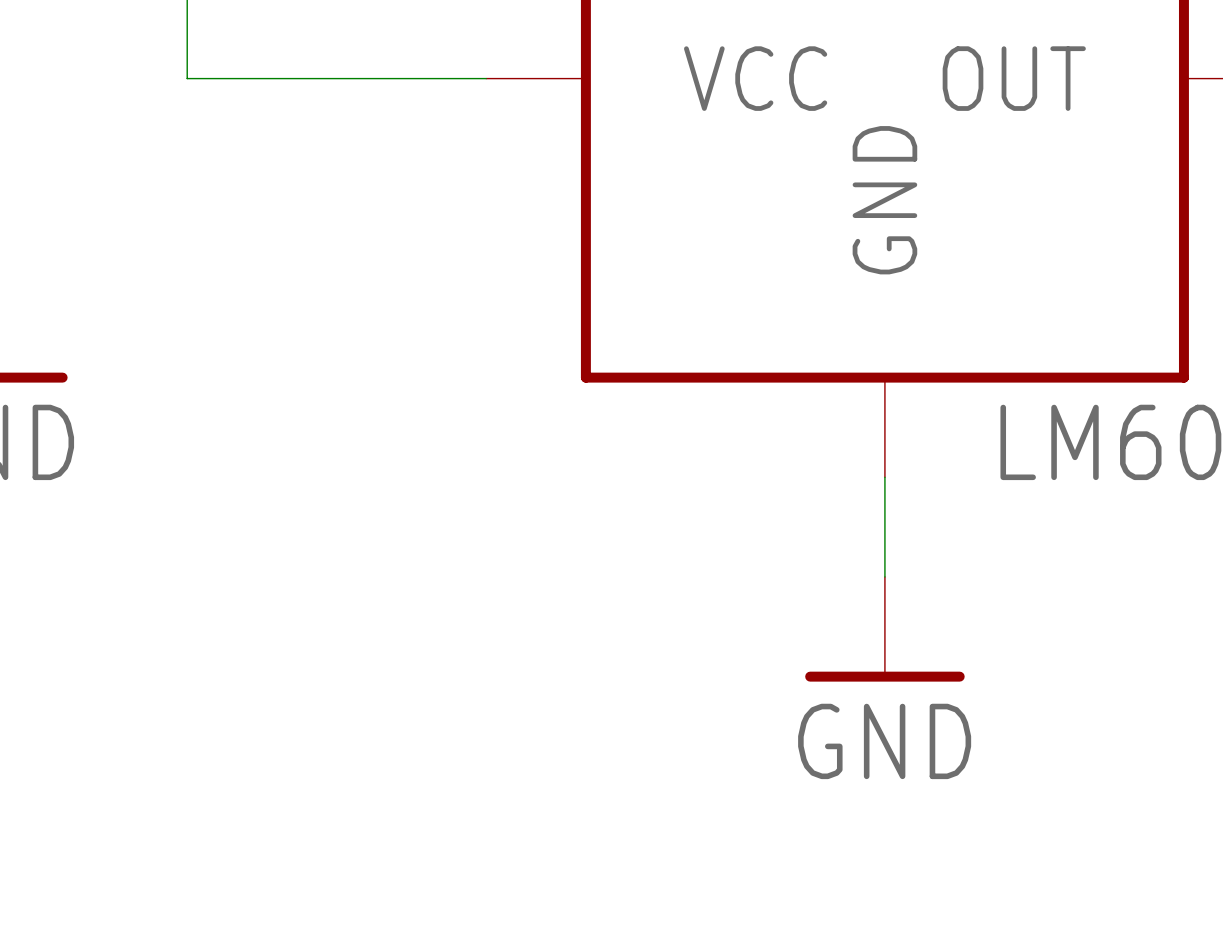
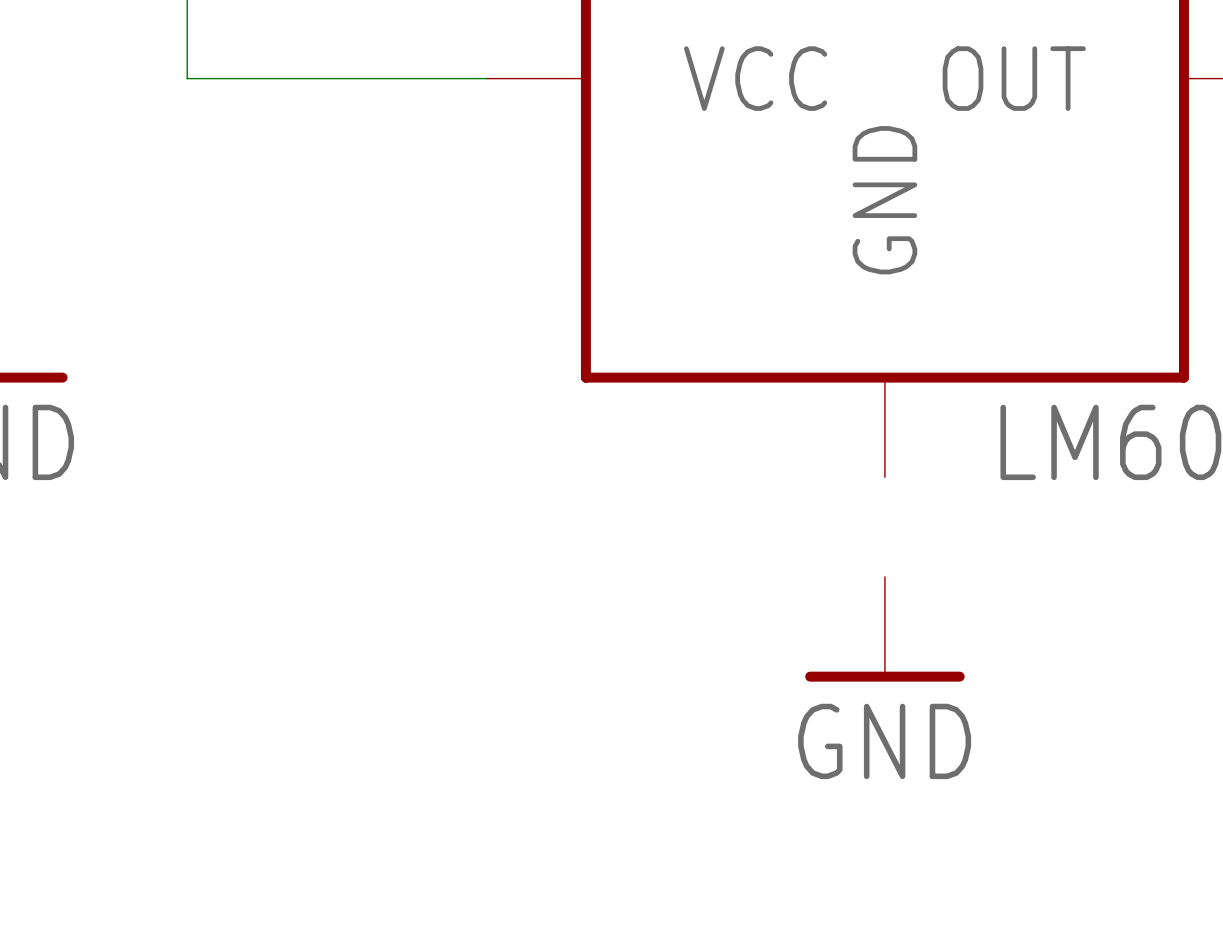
wire: (884, 477) (884, 576) -> none

